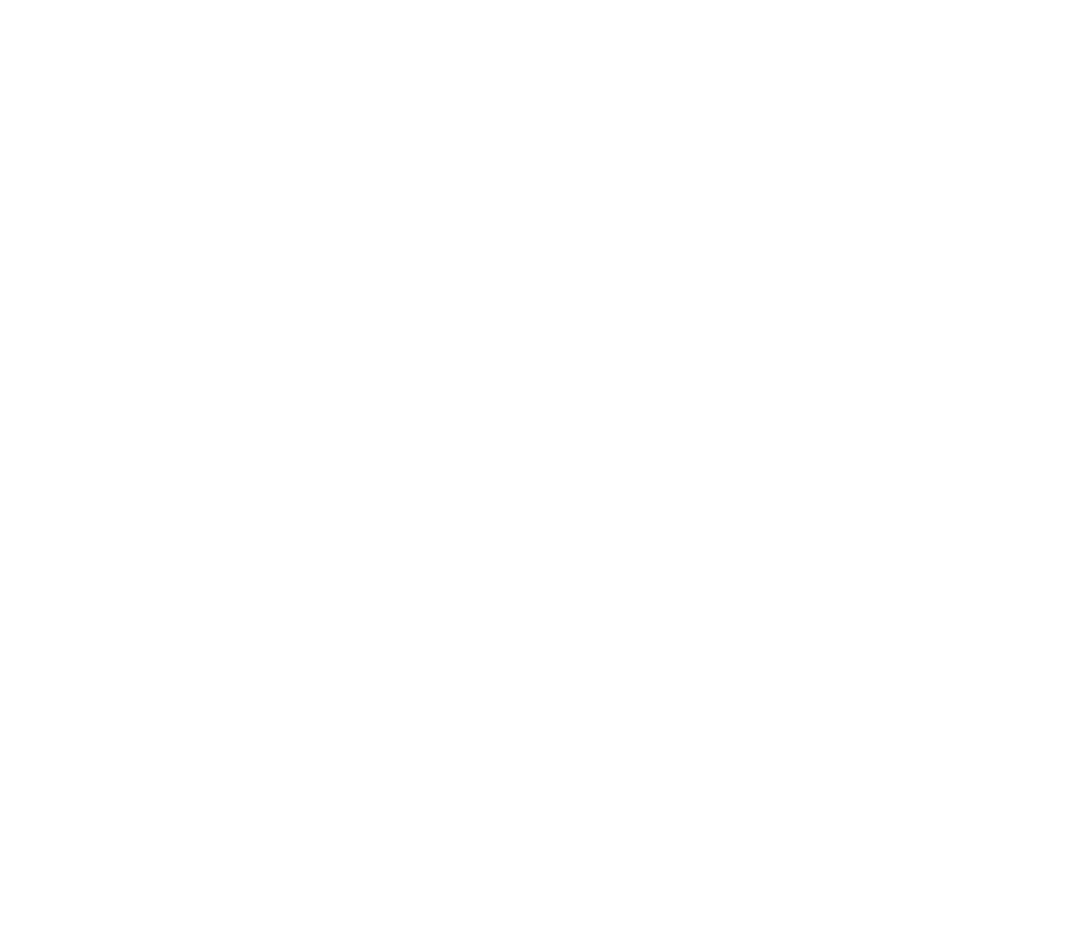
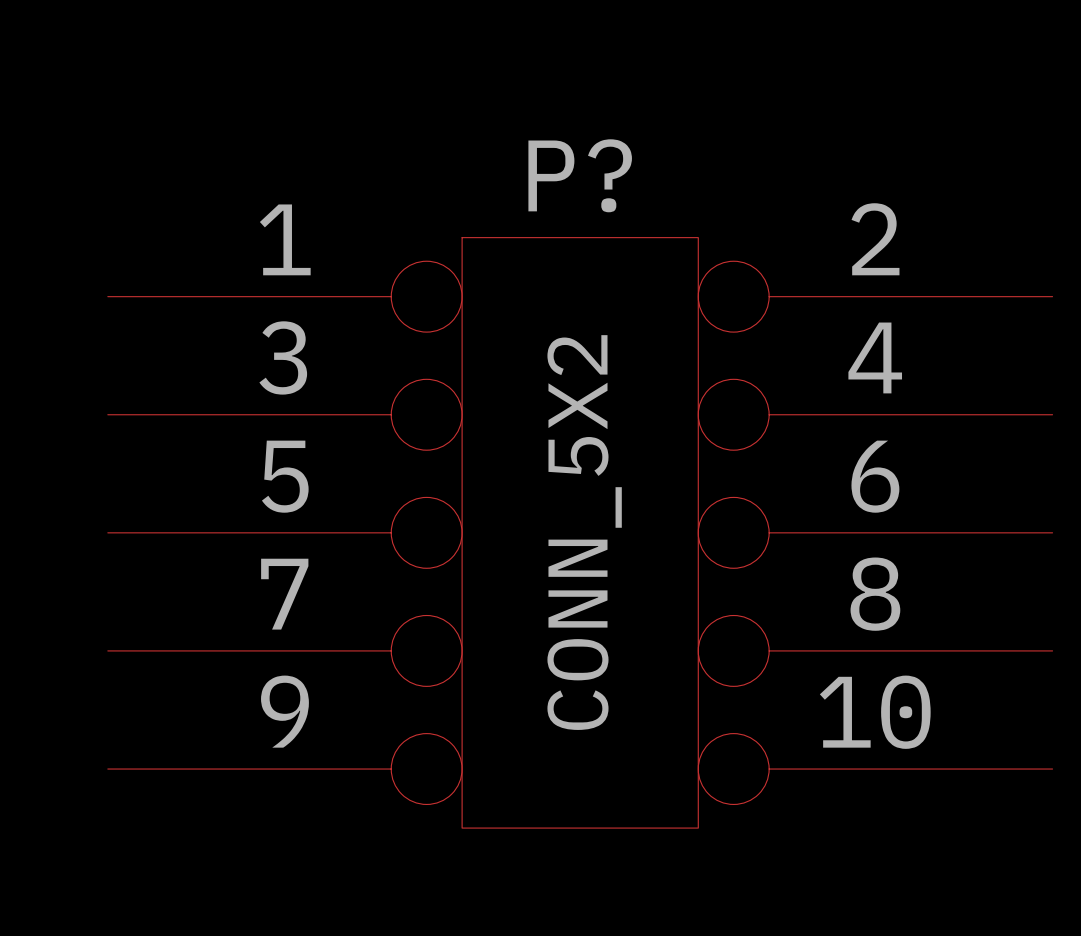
P?: none -> CONN_5X2 (580, 532)

